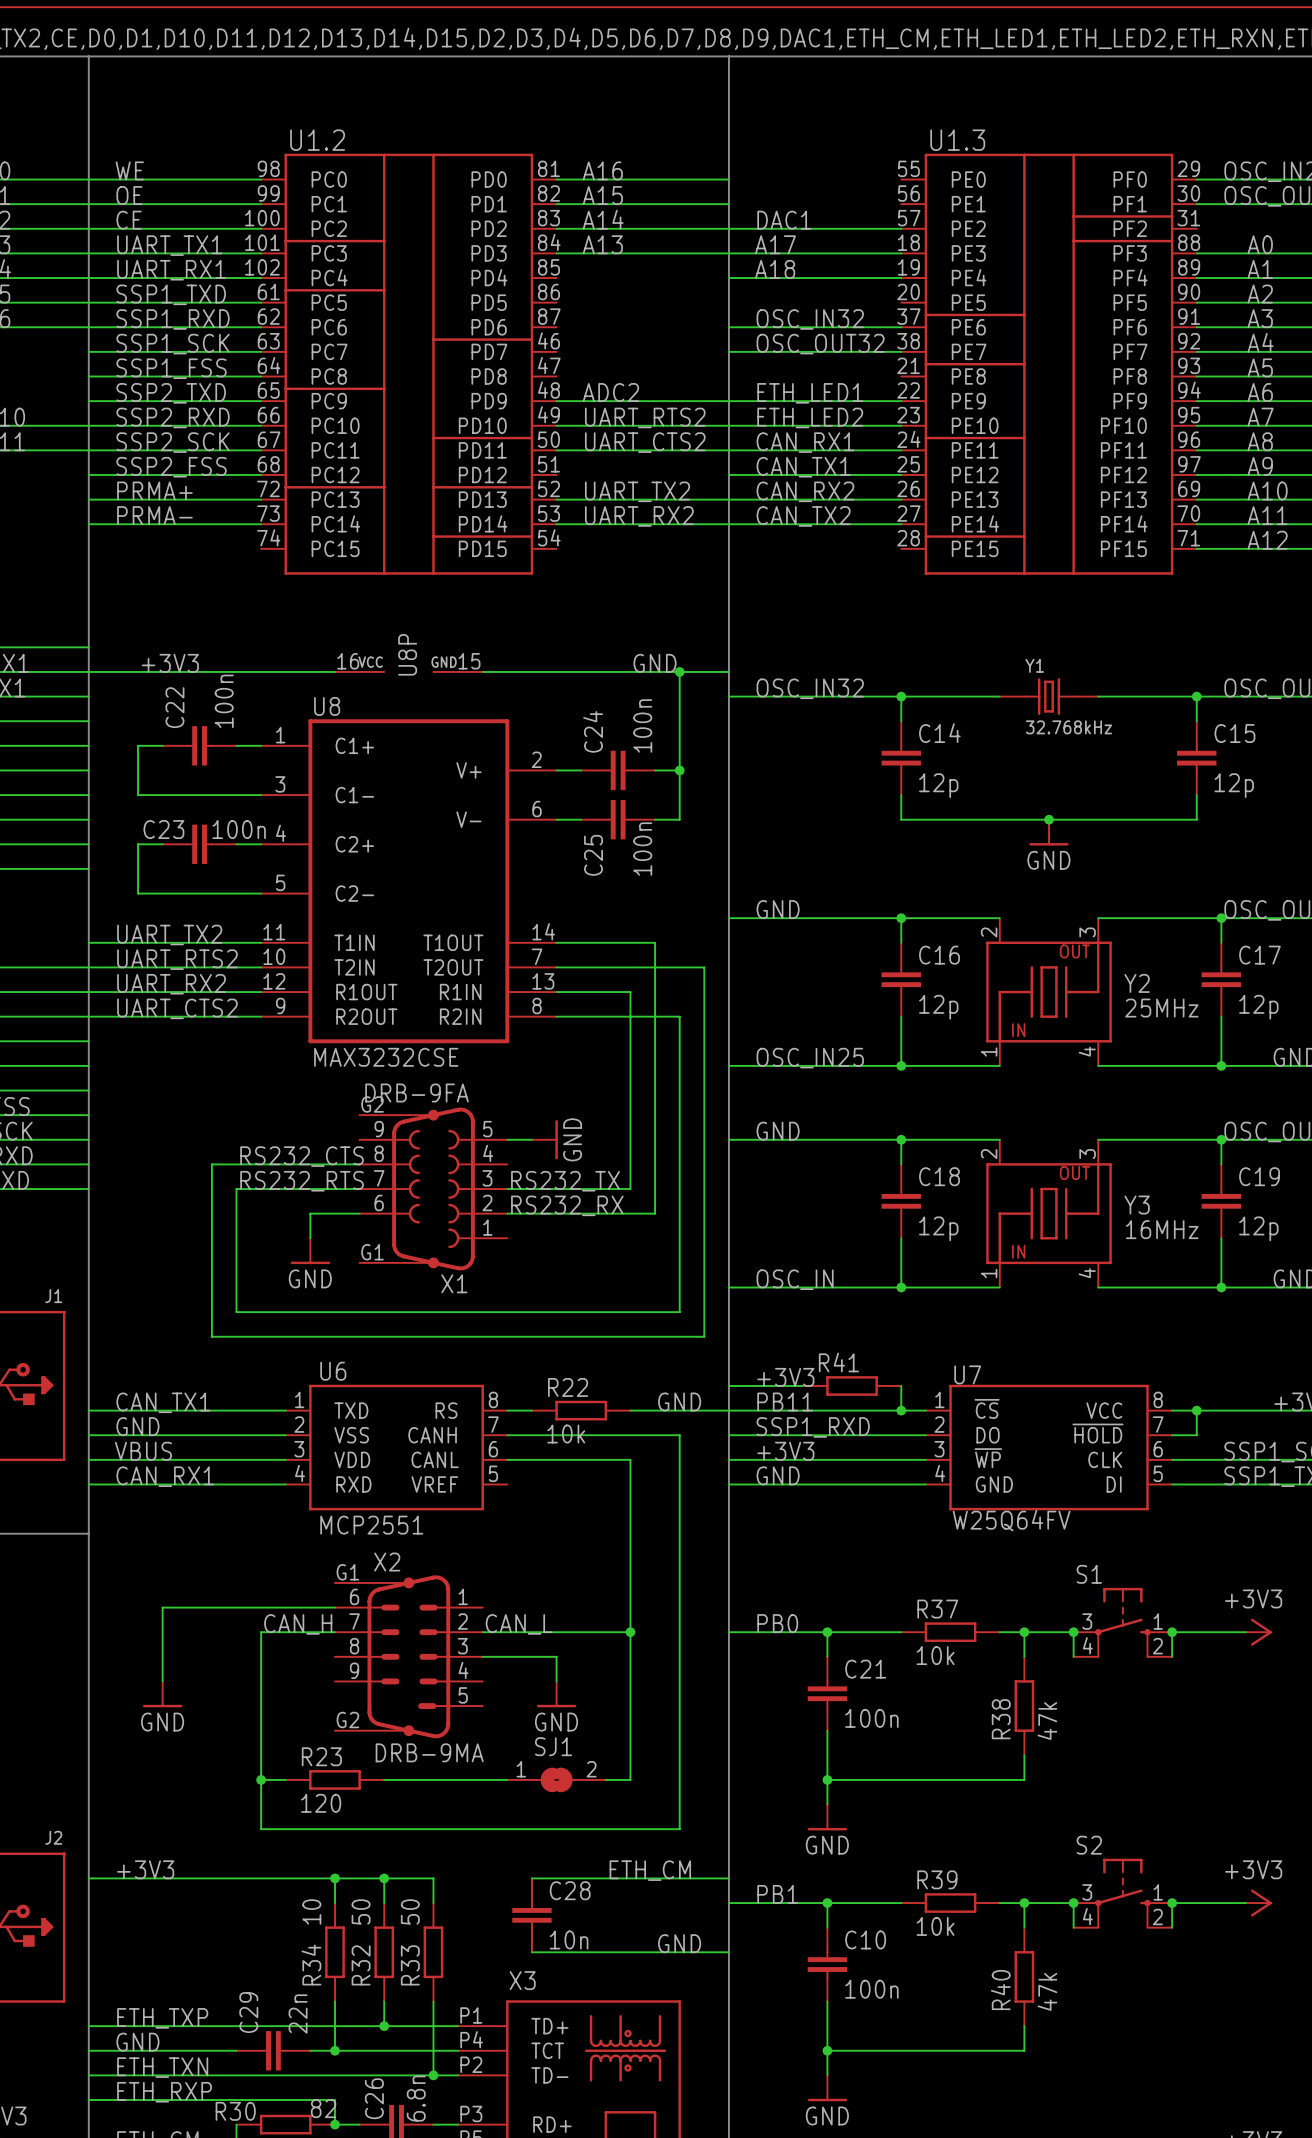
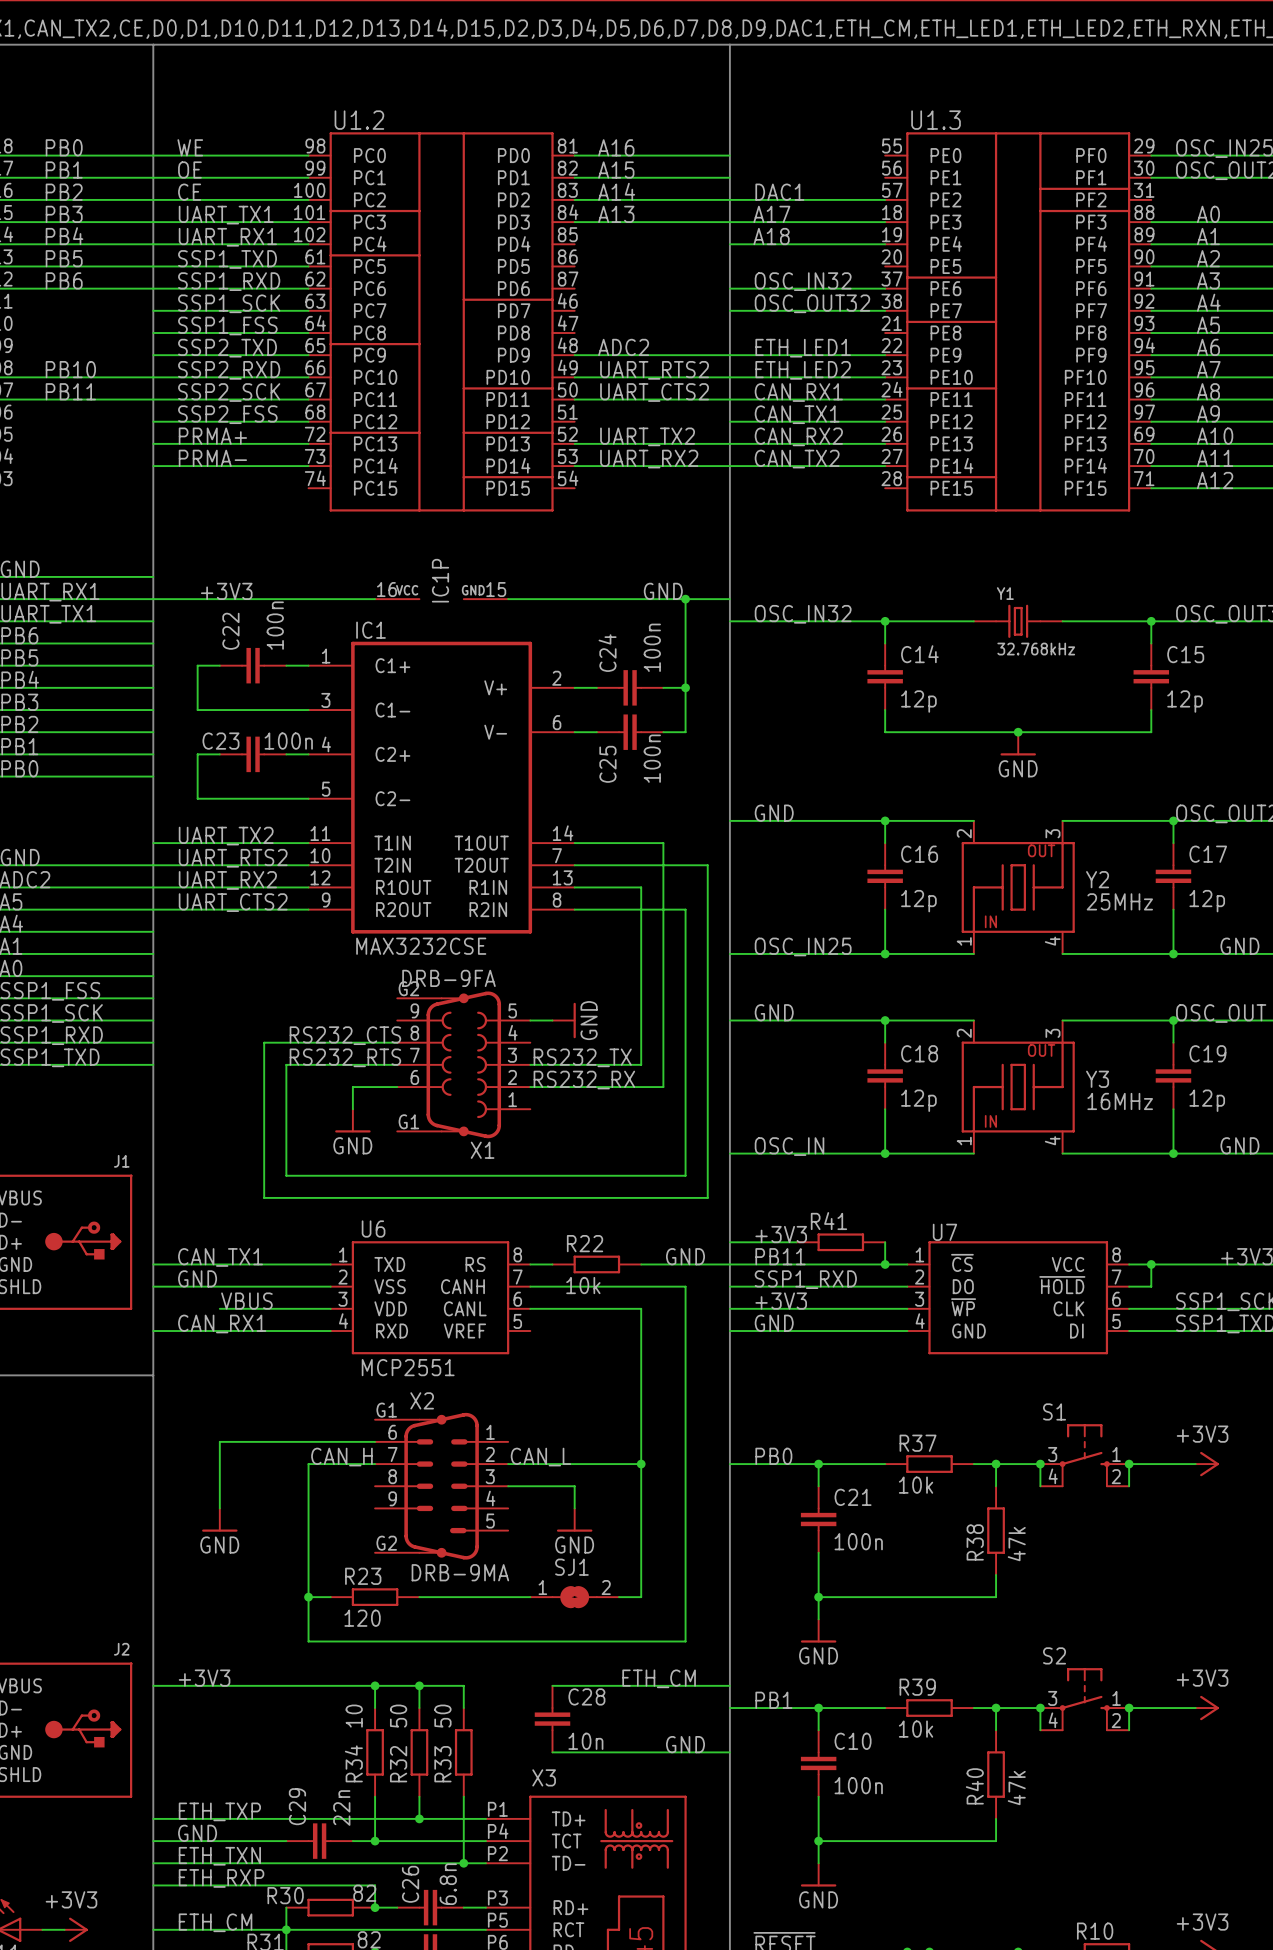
U8P name: U8P (407, 654) -> IC1P (440, 580)
U8 name: U8 (327, 706) -> IC1 (371, 630)
label position: VBUS (143, 1451) -> VBUS (246, 1301)
wire: (88, 1459) (162, 1459) -> none
U7 value: W25Q64FV (1011, 1520) -> none

